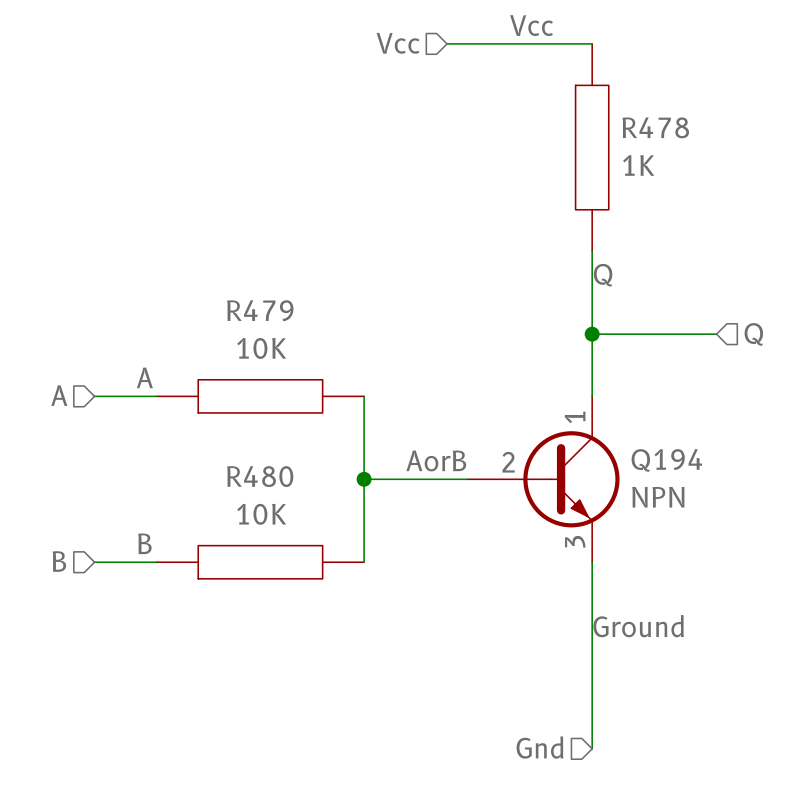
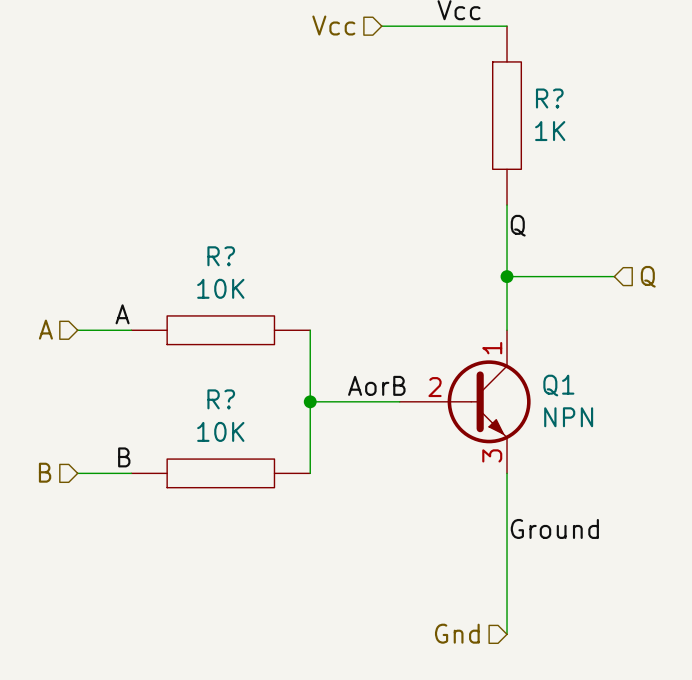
R478 name: R478 (655, 127) -> R? (549, 98)
R479 name: R479 (260, 310) -> R? (221, 256)
Q194 name: Q194 (666, 460) -> Q1 (558, 385)
R480 name: R480 (260, 476) -> R? (221, 399)

